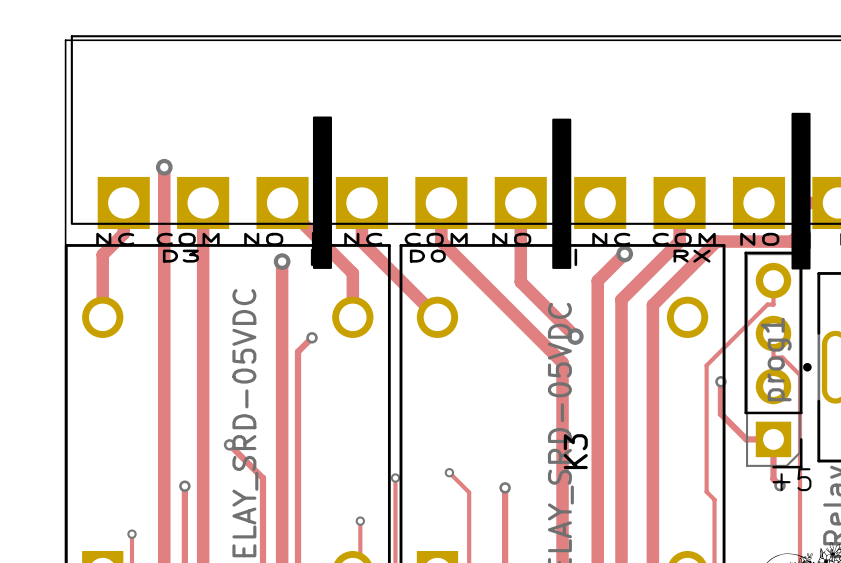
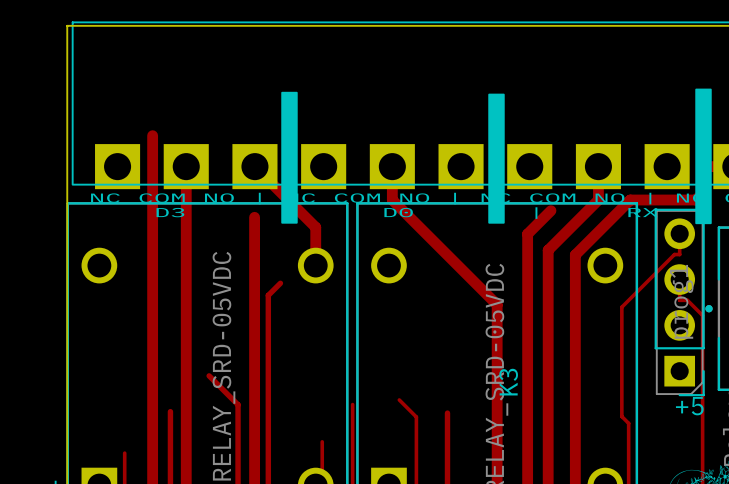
via: (164, 167) -> none
track: (123, 202) (123, 233) (102, 254) (102, 317) -> none
track: (361, 202) (361, 241) (437, 317) -> none
track: (520, 202) (520, 282) (575, 336) -> none
via: (624, 253) -> none
via: (282, 261) -> none
via: (575, 336) -> none
via: (312, 337) -> none
track: (720, 381) (720, 414) (746, 439) (773, 439) (773, 479) (779, 485) -> none
via: (720, 381) -> none
via: (229, 444) -> none
via: (449, 472) -> none
via: (395, 478) -> none
via: (779, 485) -> none
via: (184, 486) -> none
via: (505, 487) -> none
via: (360, 521) -> none
via: (132, 534) -> none

